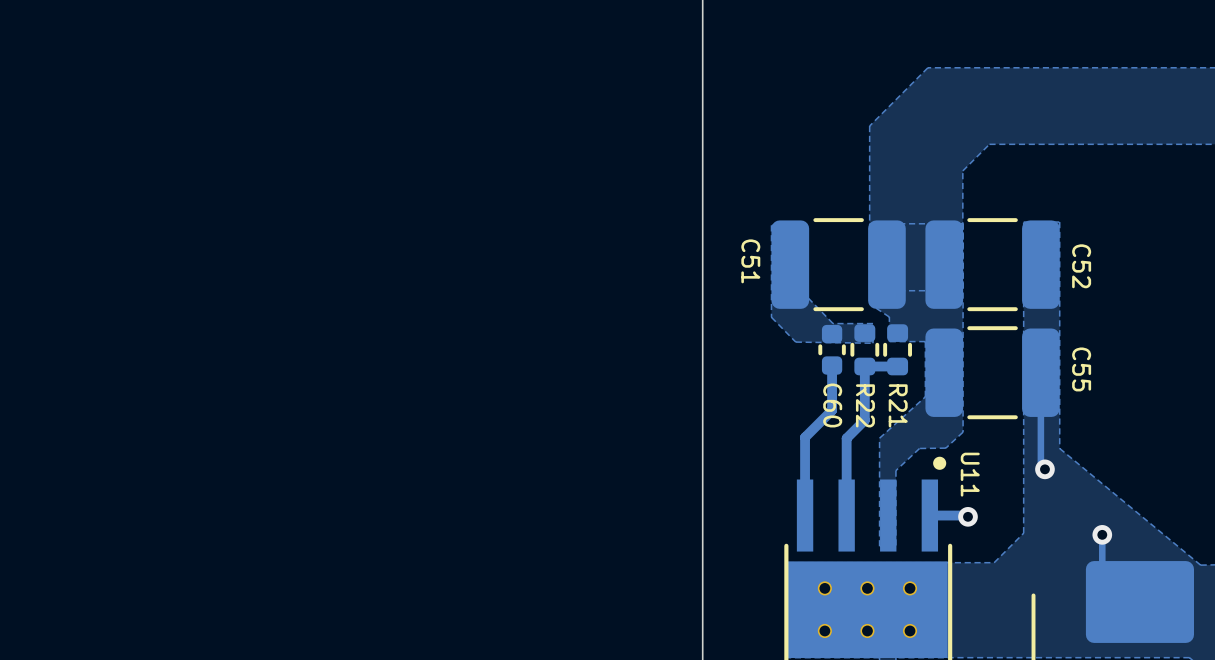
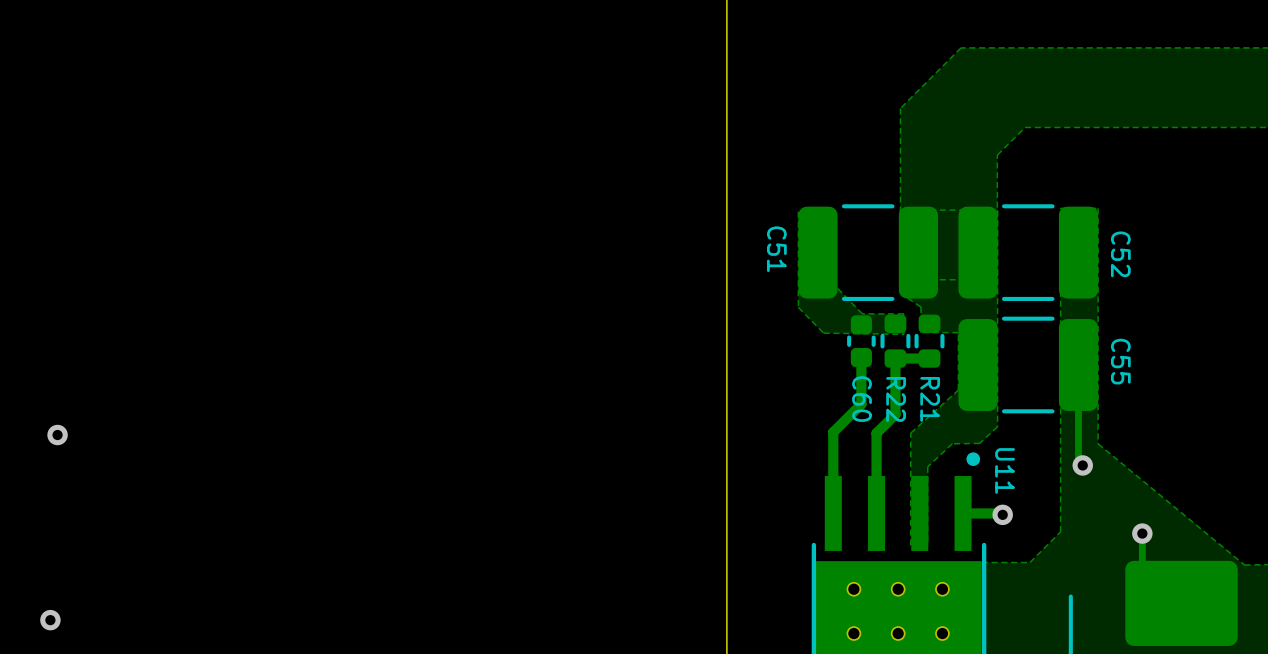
via: none -> (57, 435)
via: none -> (50, 620)

